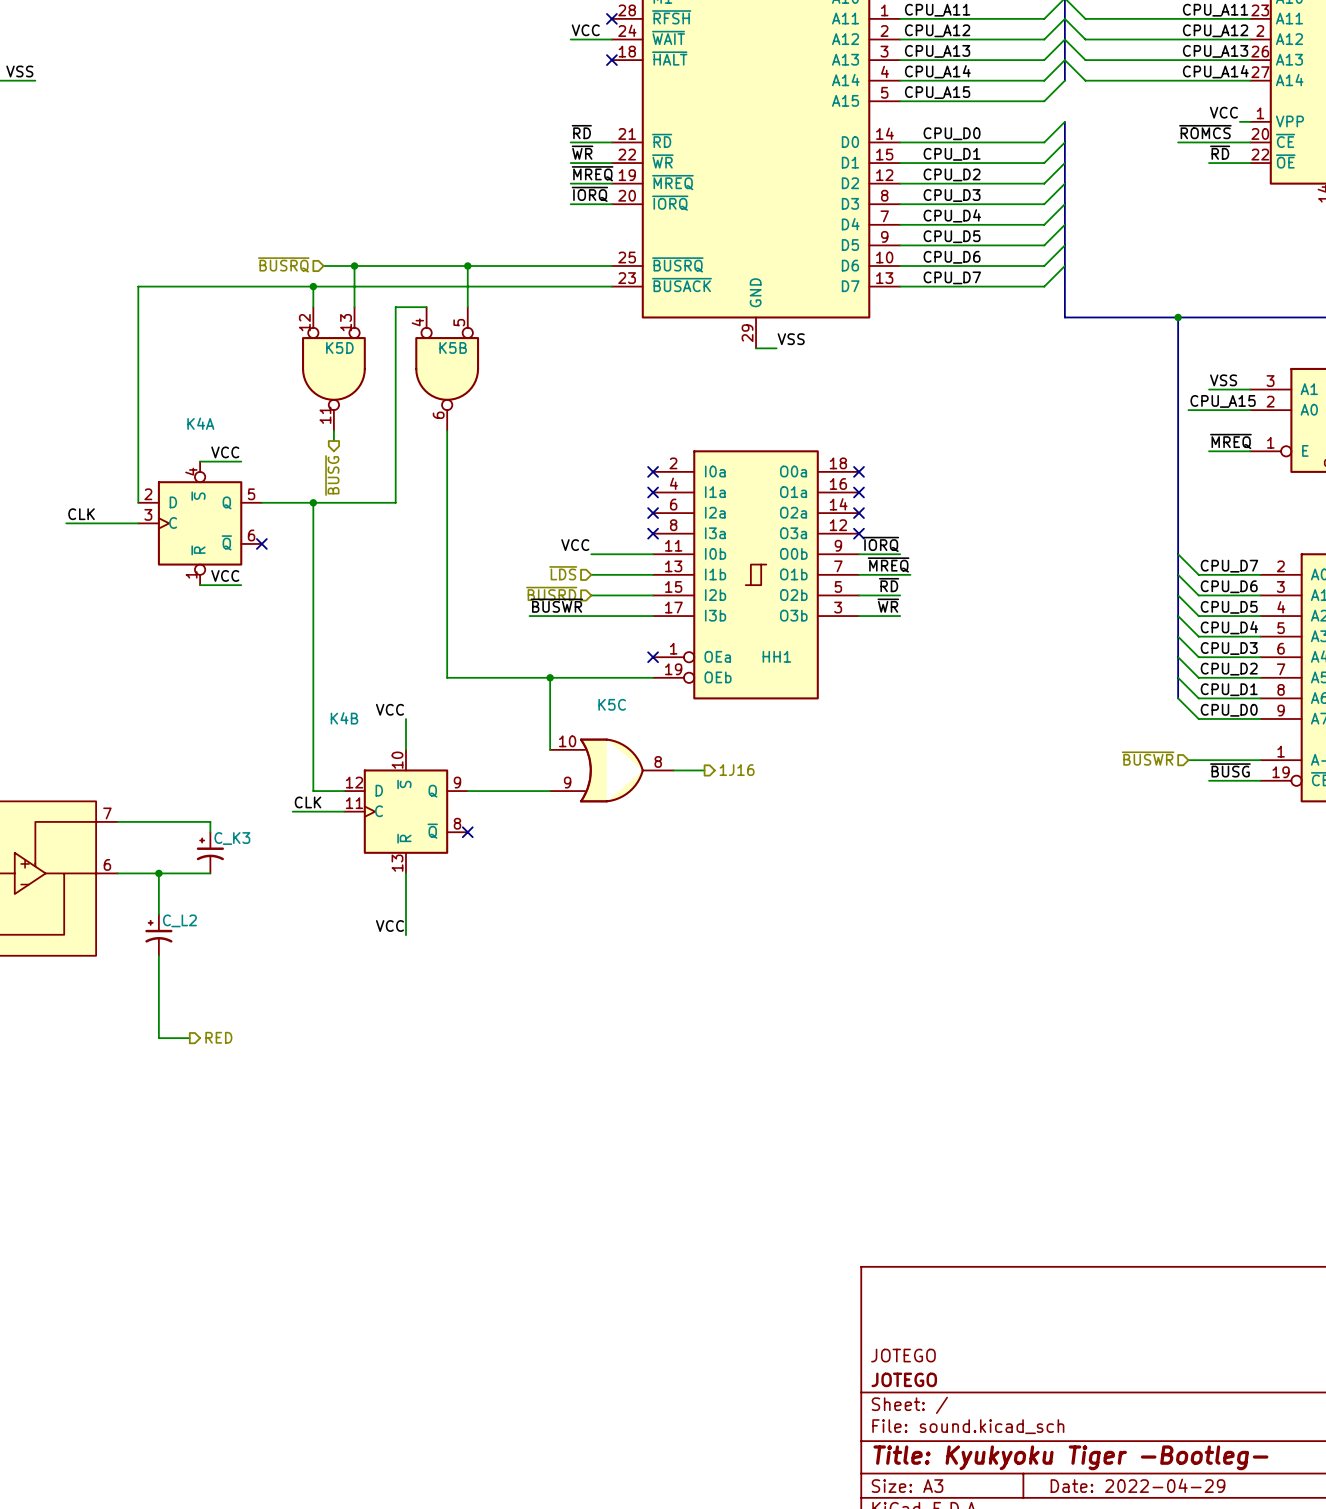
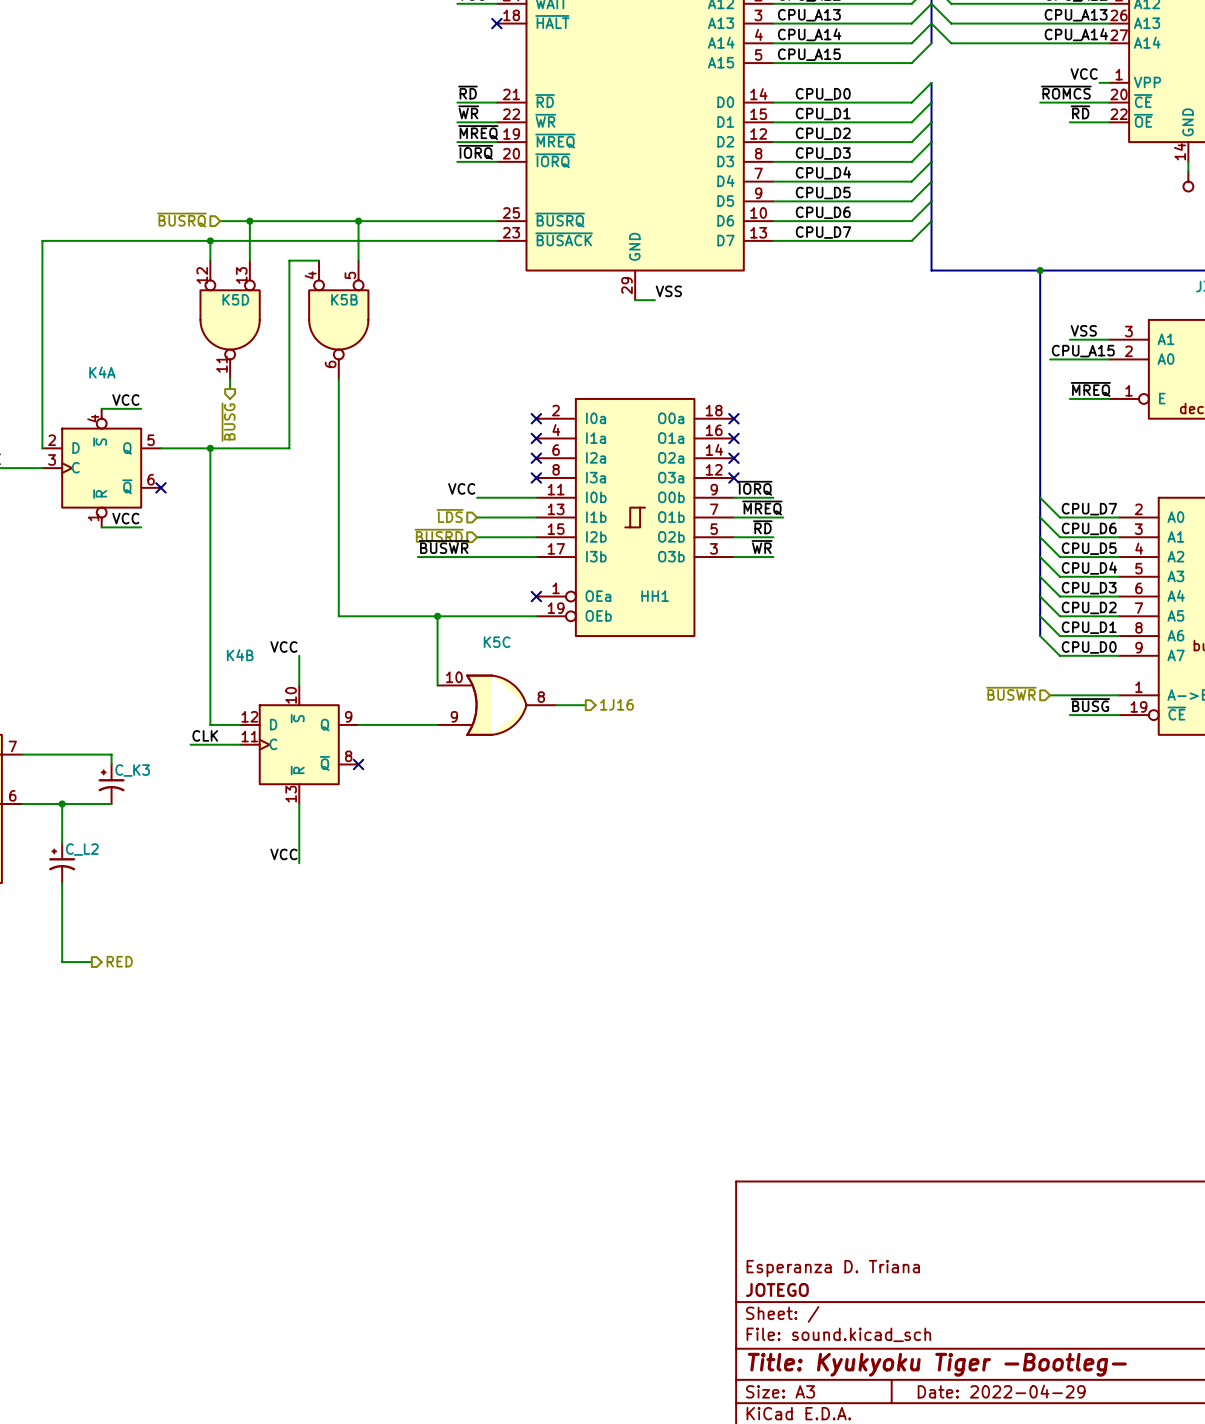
title block: JOTEGO (903, 1355) -> Esperanza D. Triana (833, 1268)

